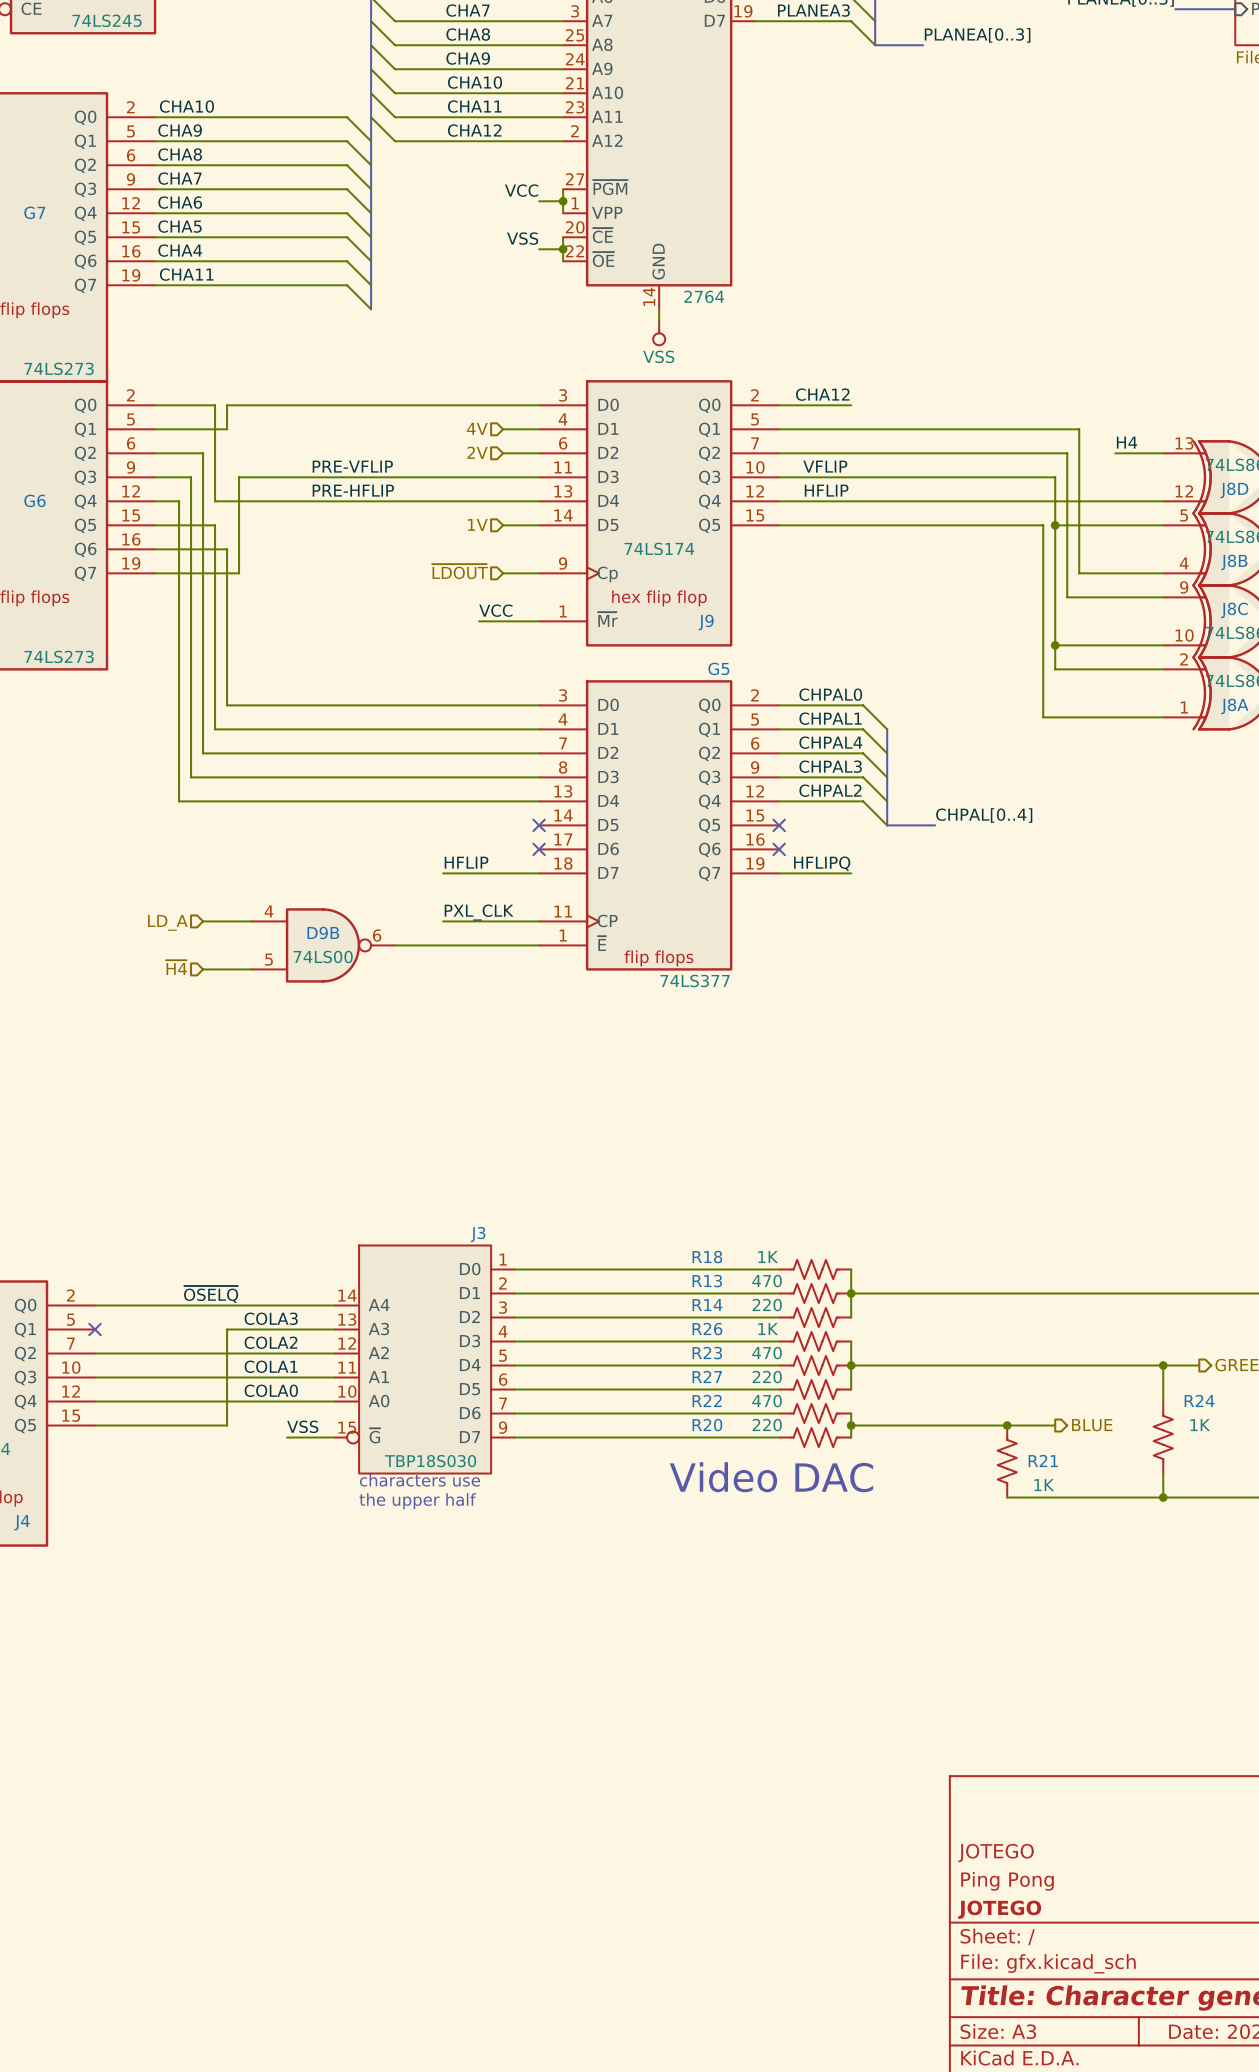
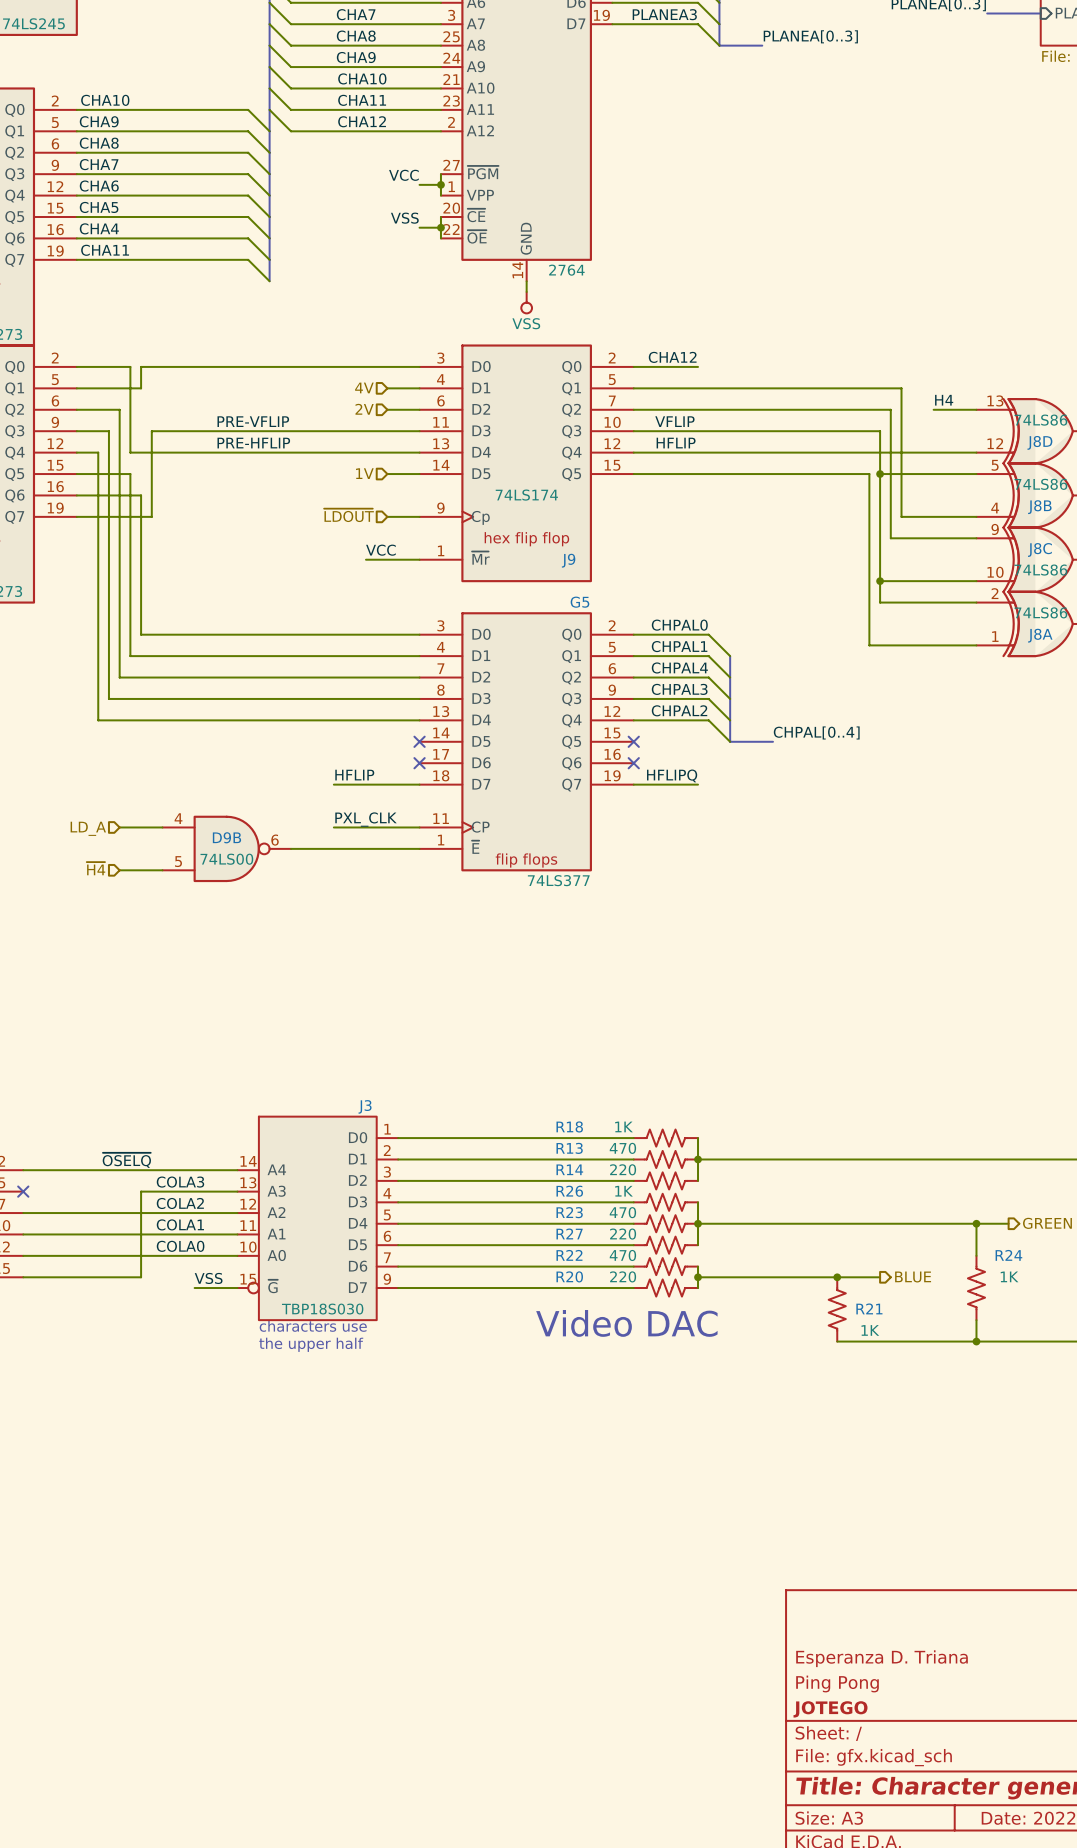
title block: JOTEGO (996, 1853) -> Esperanza D. Triana (882, 1658)

